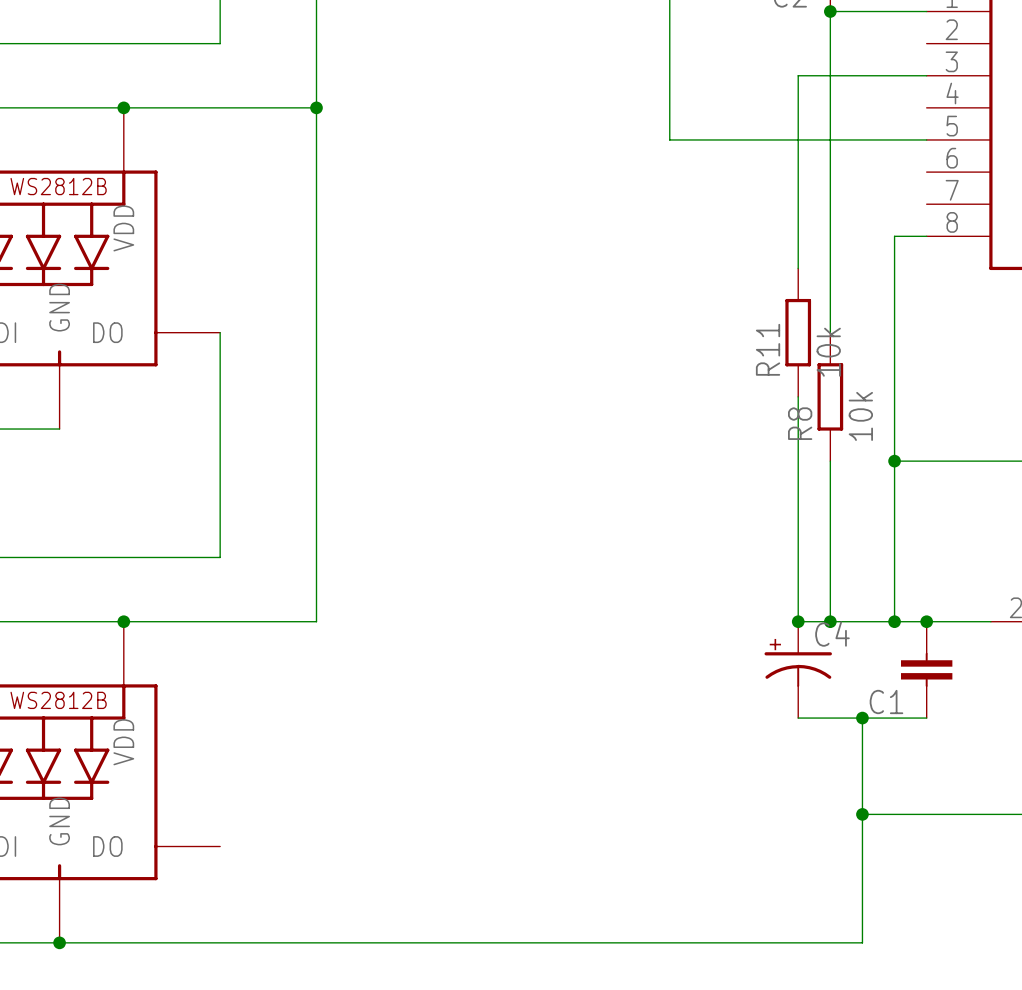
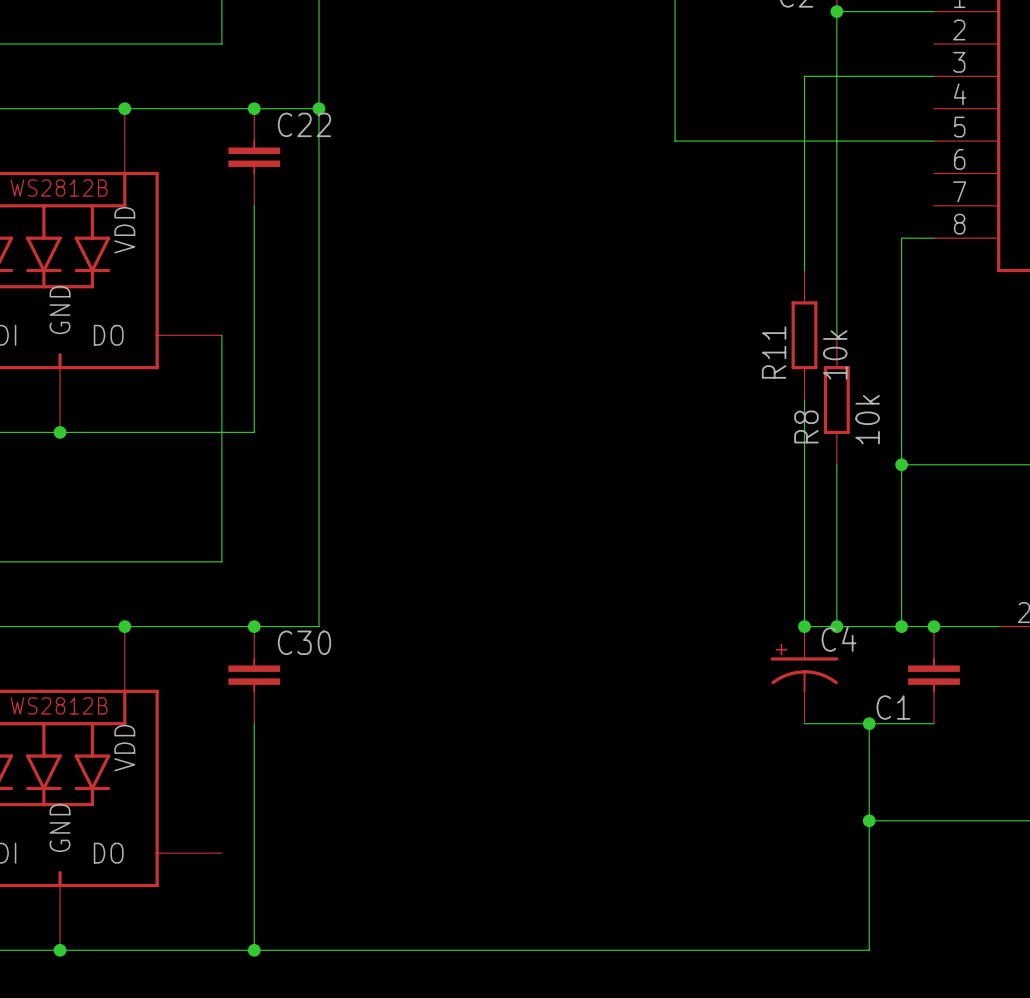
junction: none -> (254, 108)
C22: none -> (254, 157)
wire: none -> (254, 205) (254, 432) (60, 432)
junction: none -> (60, 432)
junction: none -> (254, 626)
C30: none -> (254, 675)
wire: none -> (254, 723) (254, 950)
junction: none -> (254, 950)

